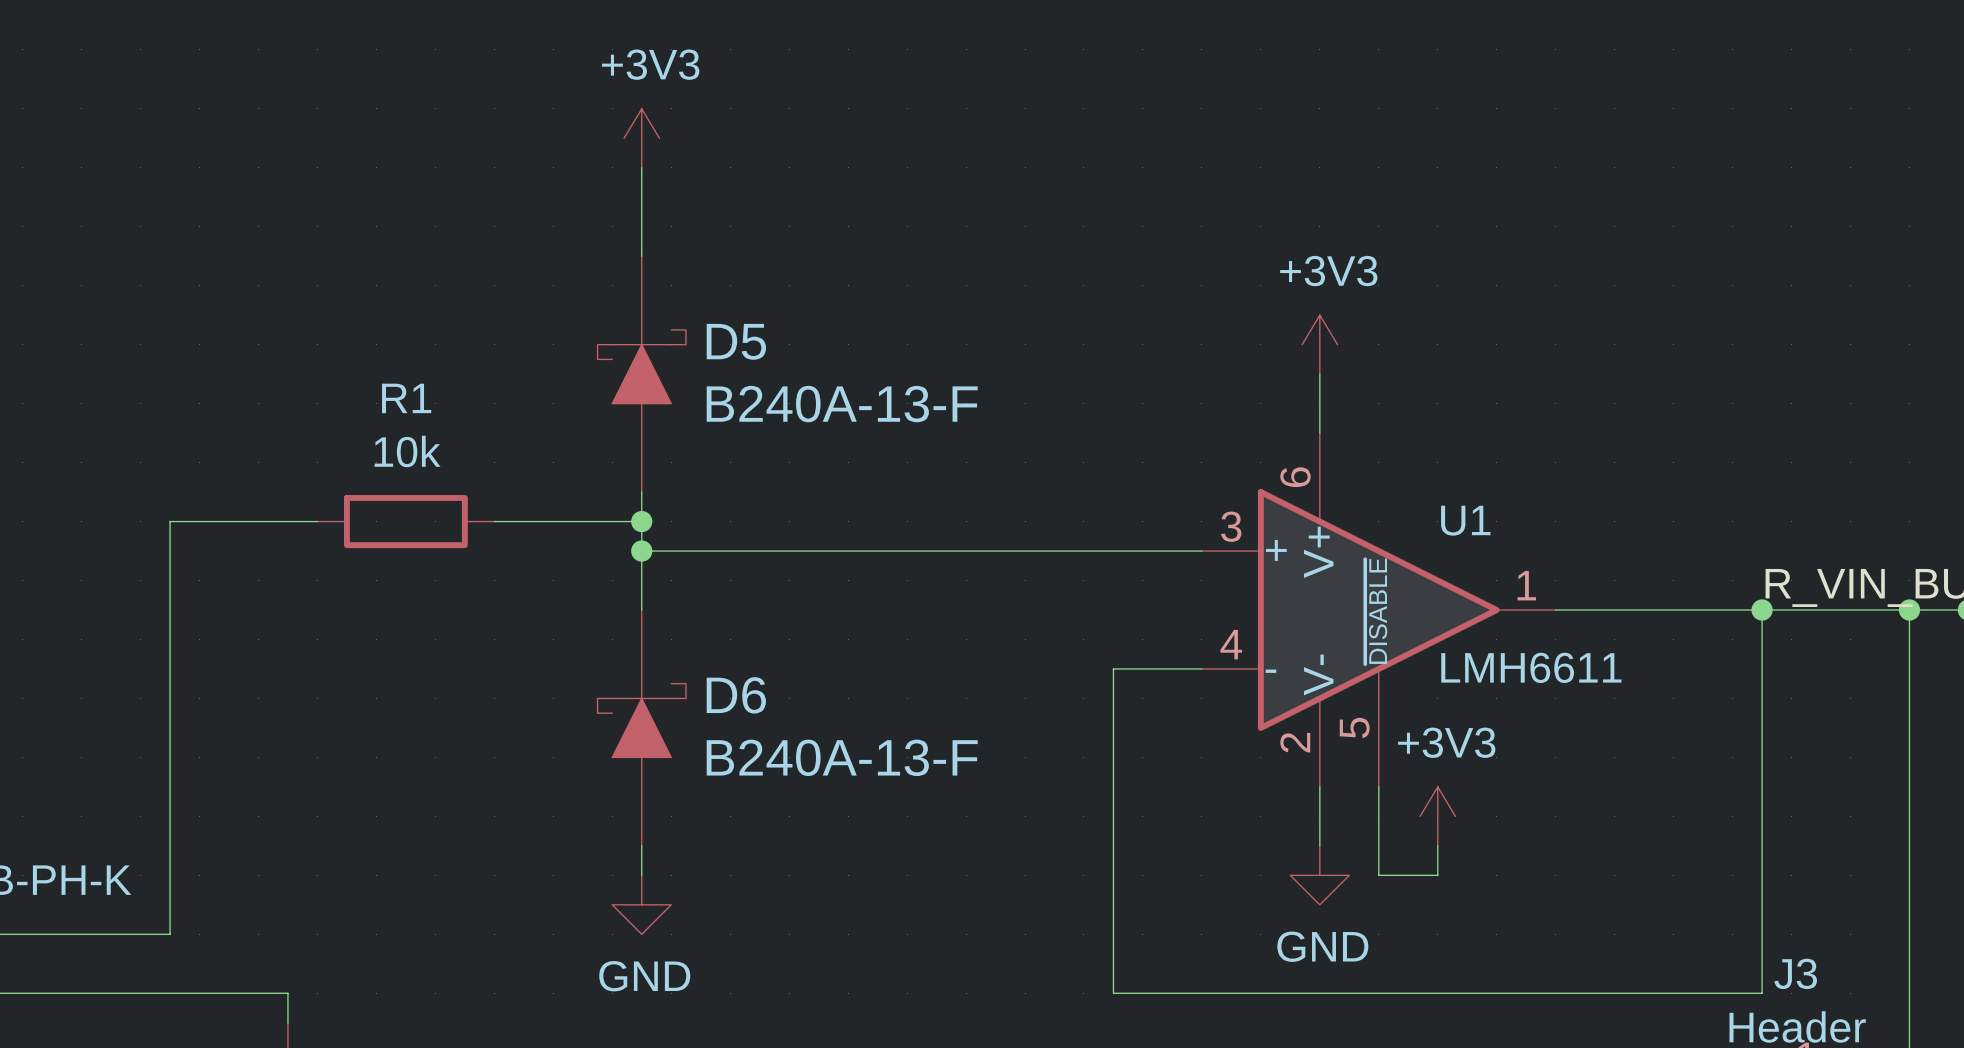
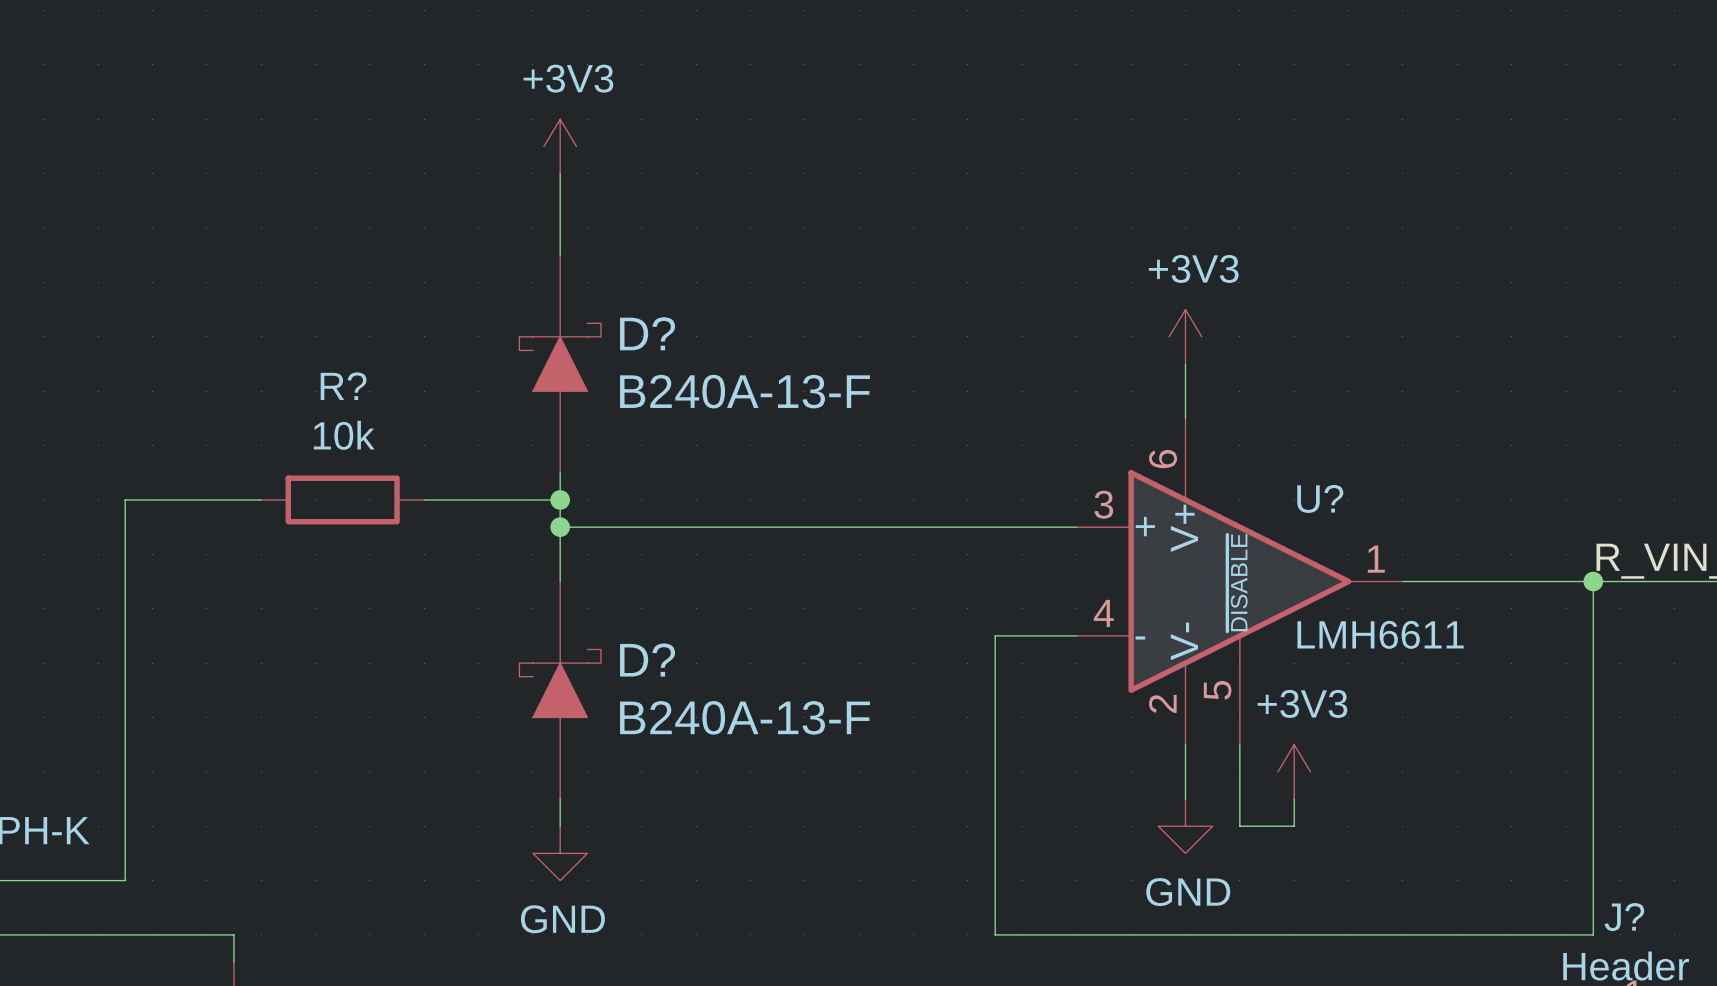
D5 name: D5 (736, 341) -> D? (647, 333)
R1 name: R1 (406, 398) -> R? (343, 386)
U1 name: U1 (1465, 520) -> U? (1320, 498)
D6 name: D6 (736, 695) -> D? (647, 659)
J3 name: J3 (1795, 973) -> J? (1624, 917)

